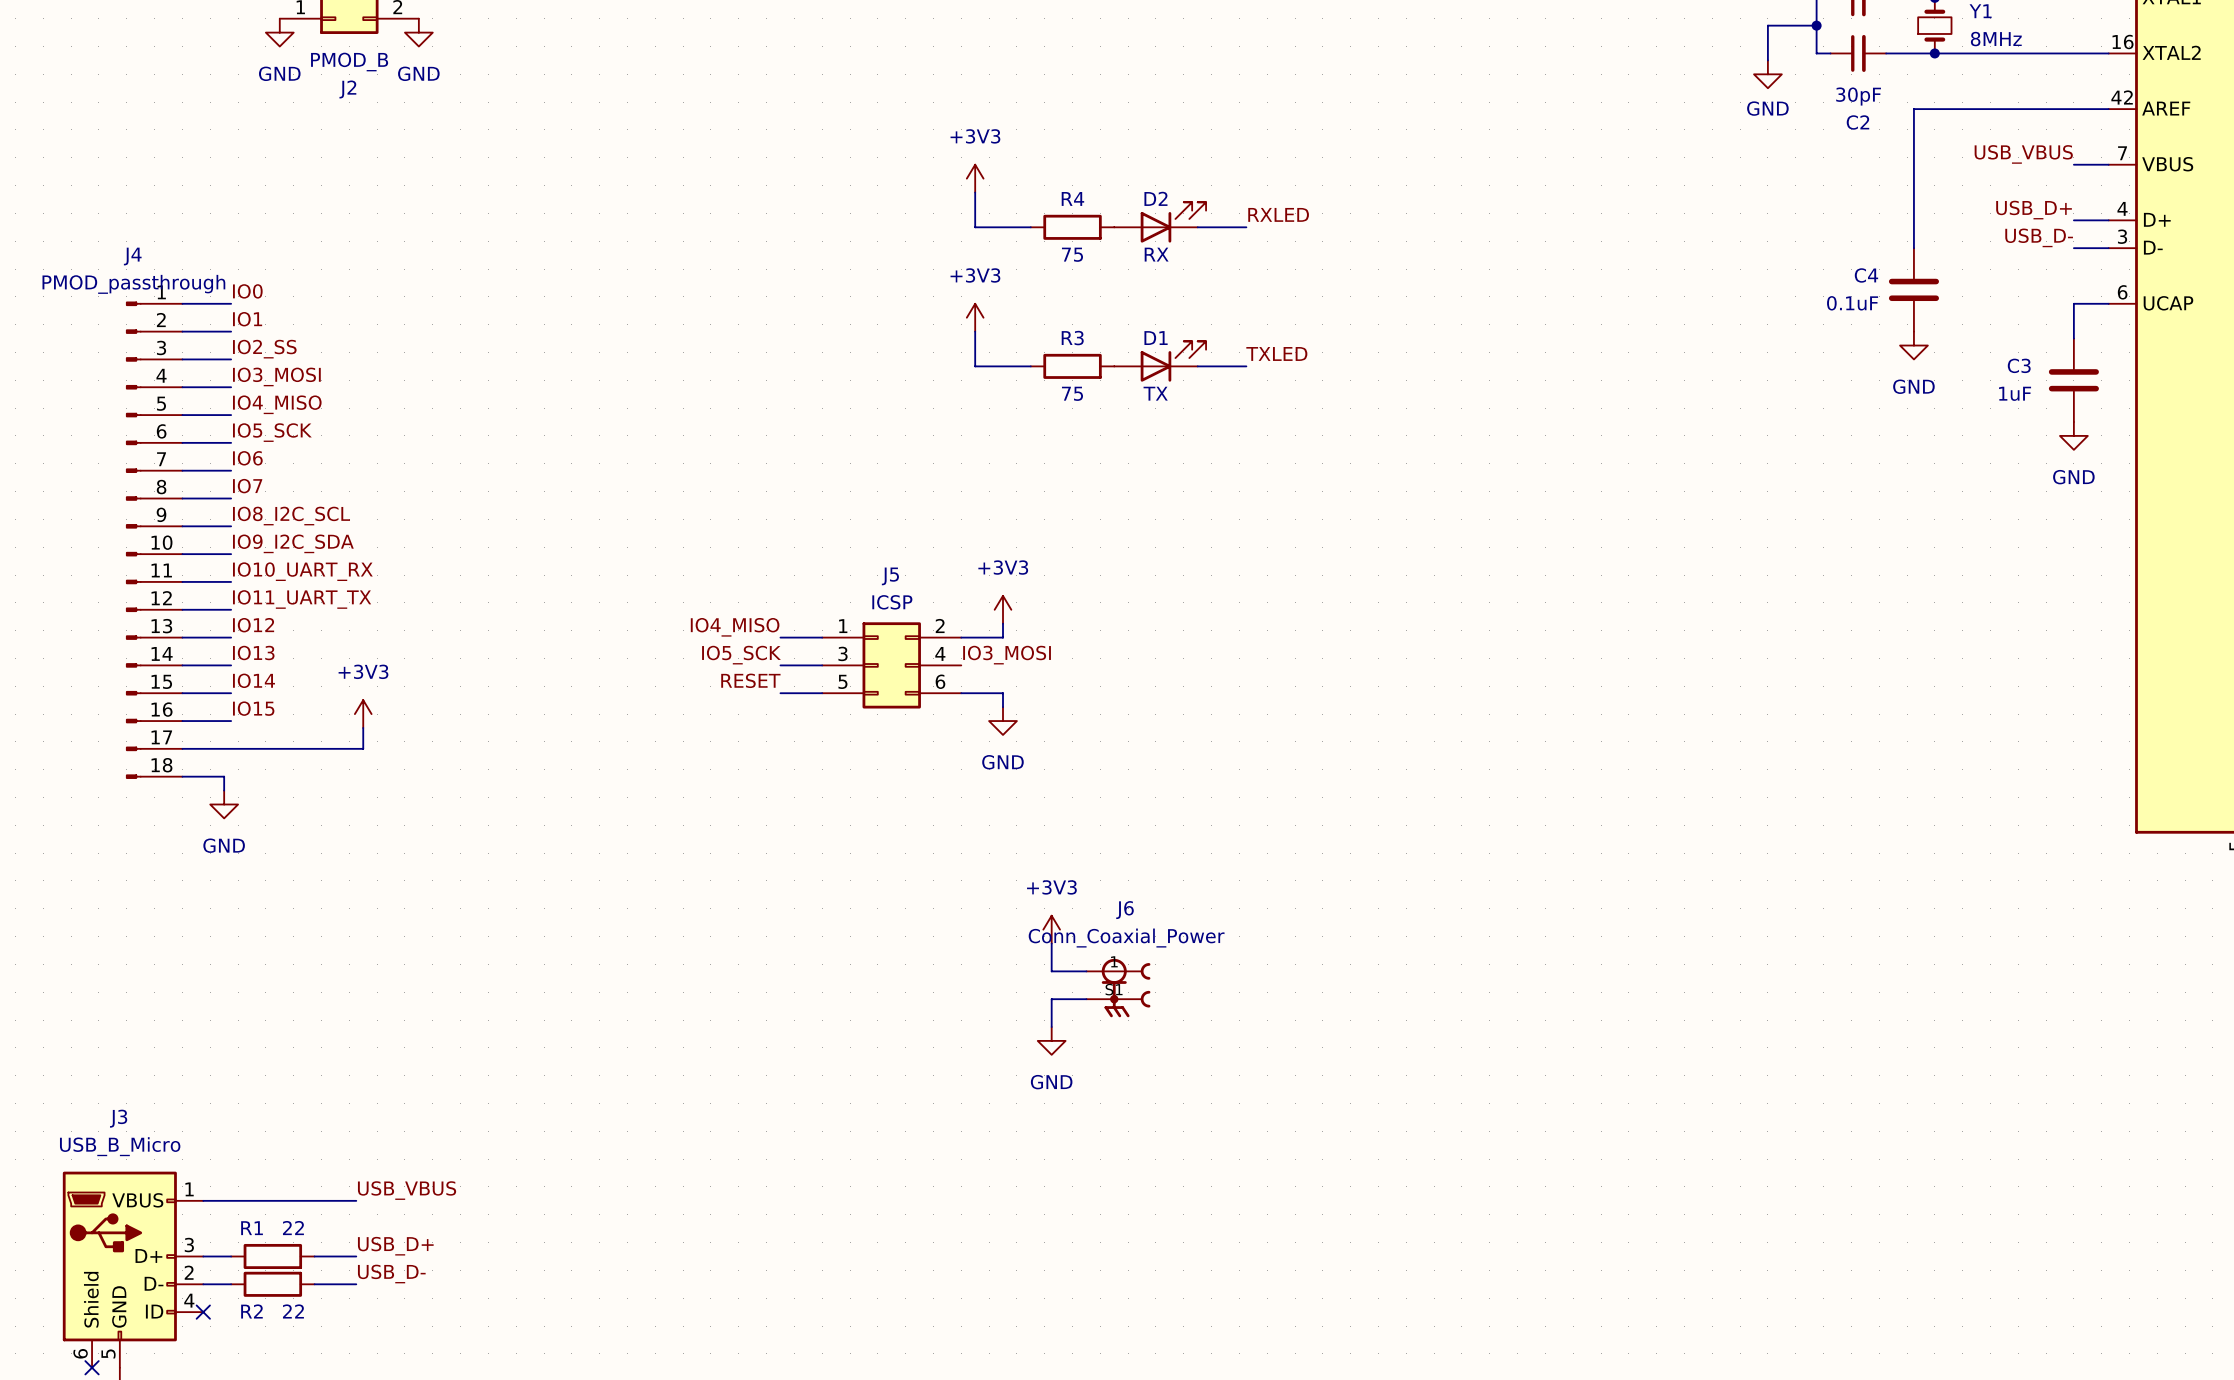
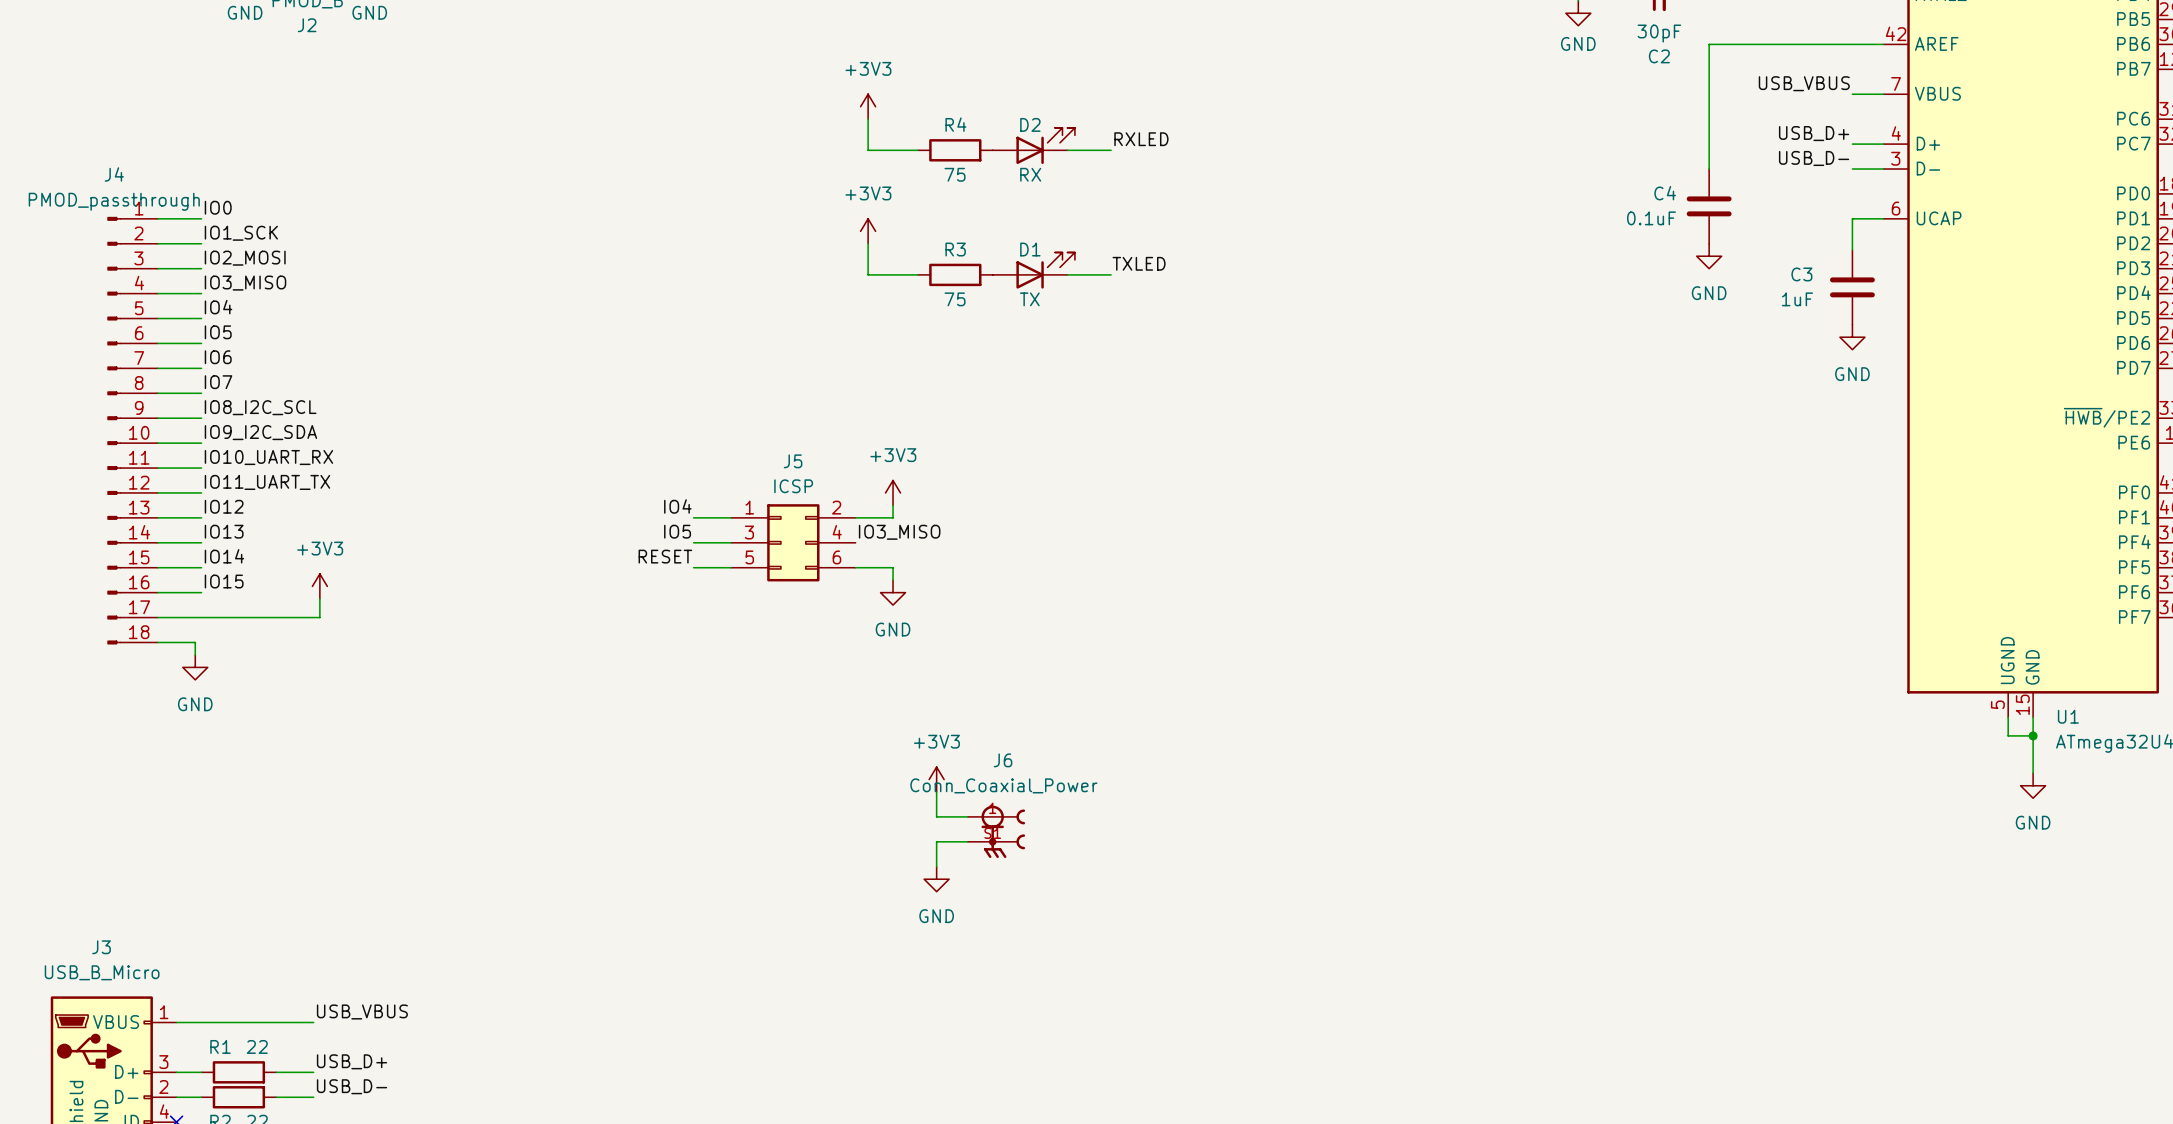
label: IO1 (247, 319) -> IO1_SCK (241, 233)
label: IO2_SS (264, 349) -> IO2_MOSI (245, 258)
label: IO3_MOSI (276, 376) -> IO3_MISO (245, 283)
label: IO4_MISO (277, 404) -> IO4 (218, 307)
label: IO5_SCK (272, 432) -> IO5 (218, 332)
label: IO4_MISO (735, 627) -> IO4 (677, 506)
label: IO5_SCK (741, 655) -> IO5 (677, 531)
label: IO3_MOSI (1007, 655) -> IO3_MISO (899, 532)

